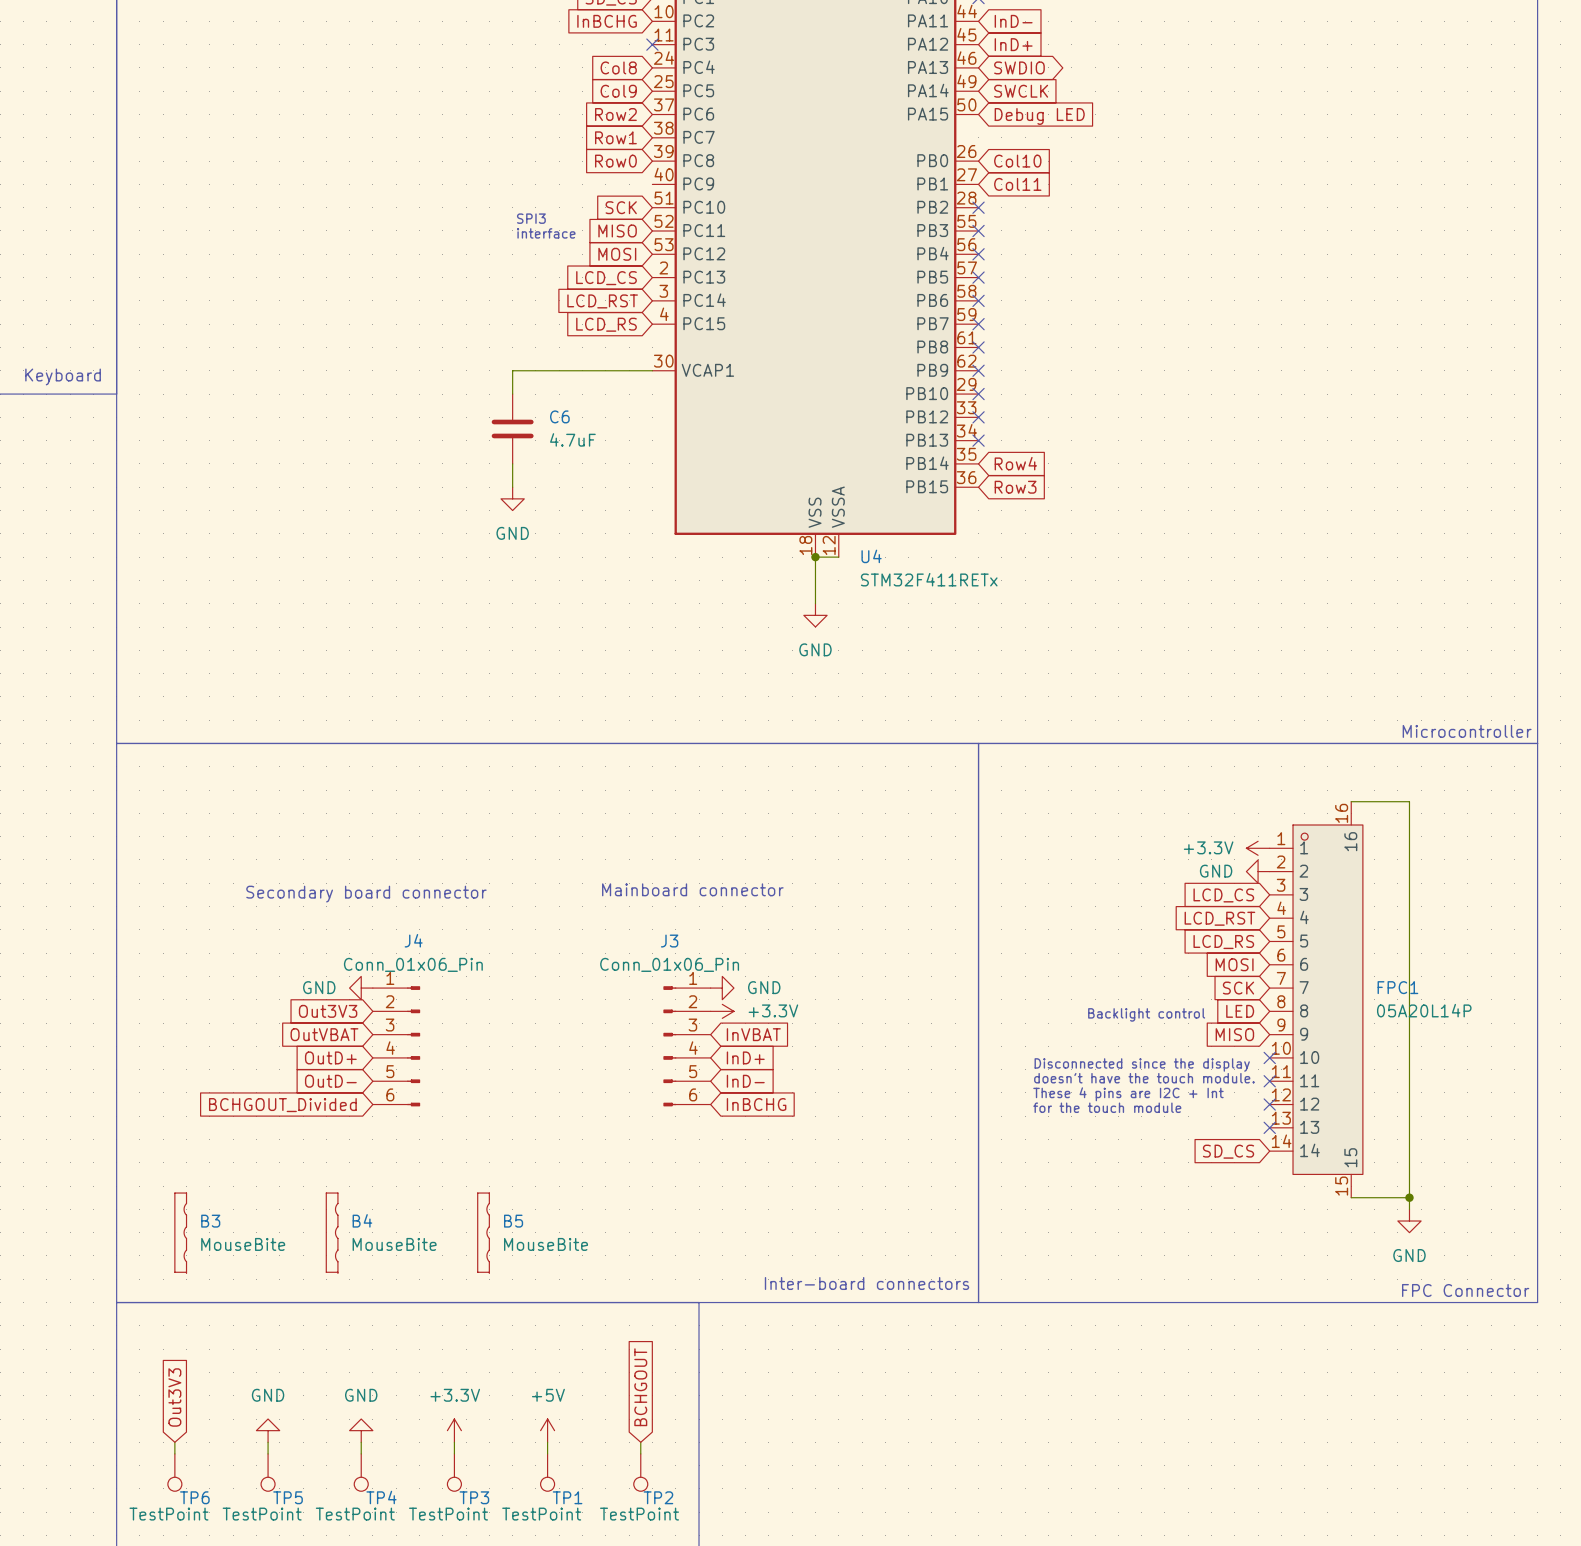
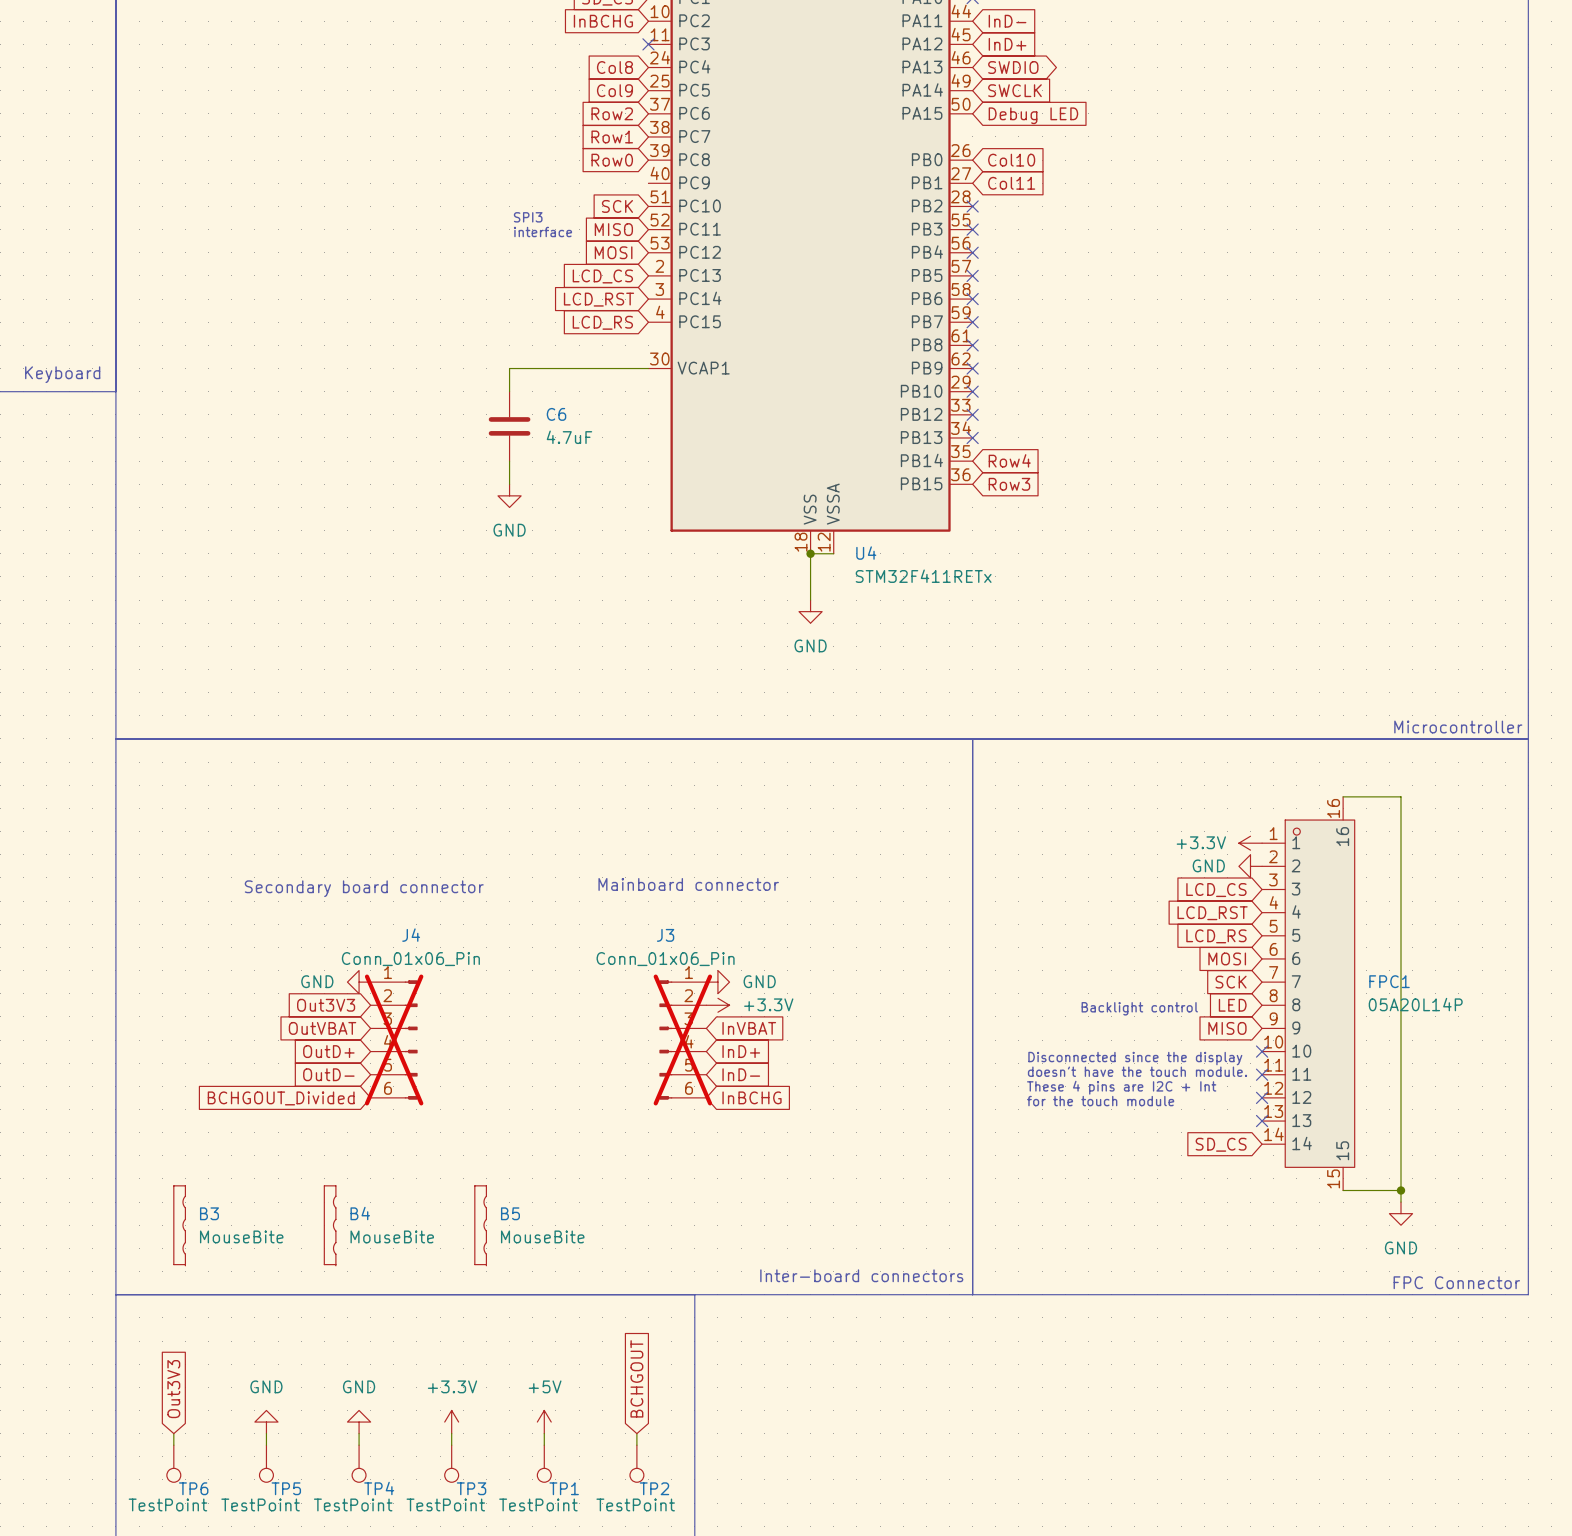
J4 do-not-place cross: none -> (394, 1040)
J3 do-not-place cross: none -> (682, 1040)

